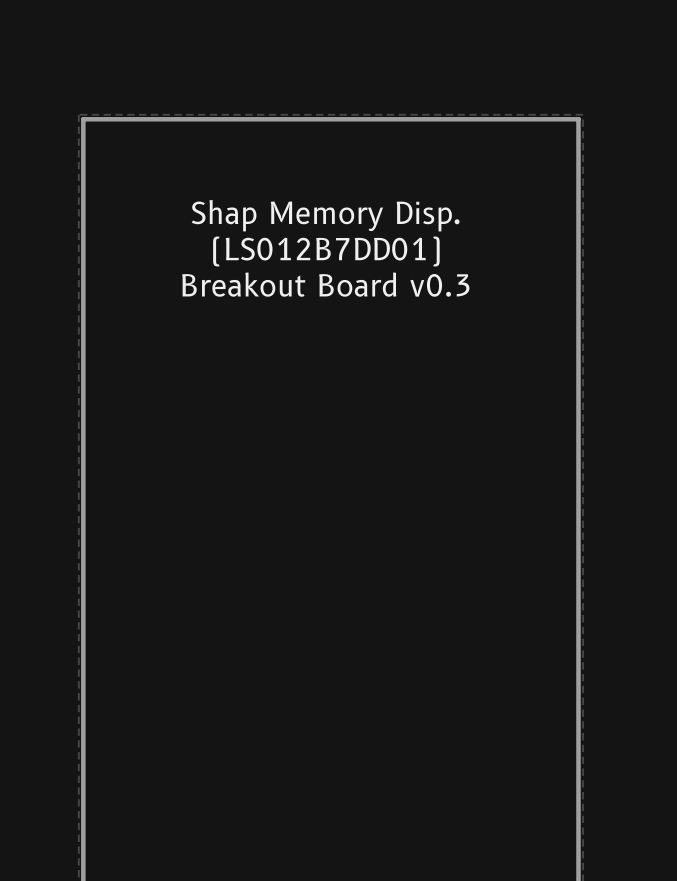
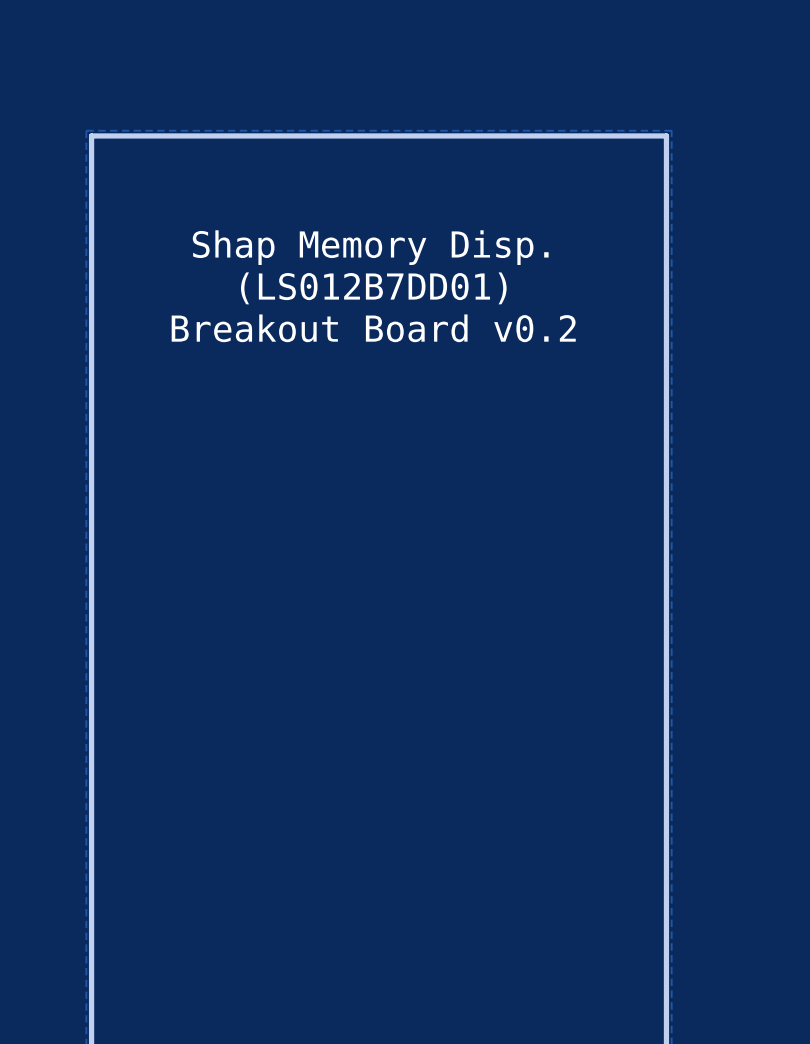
text: Breakout Board v0.3 (325, 284) -> Breakout Board v0.2 (373, 328)

